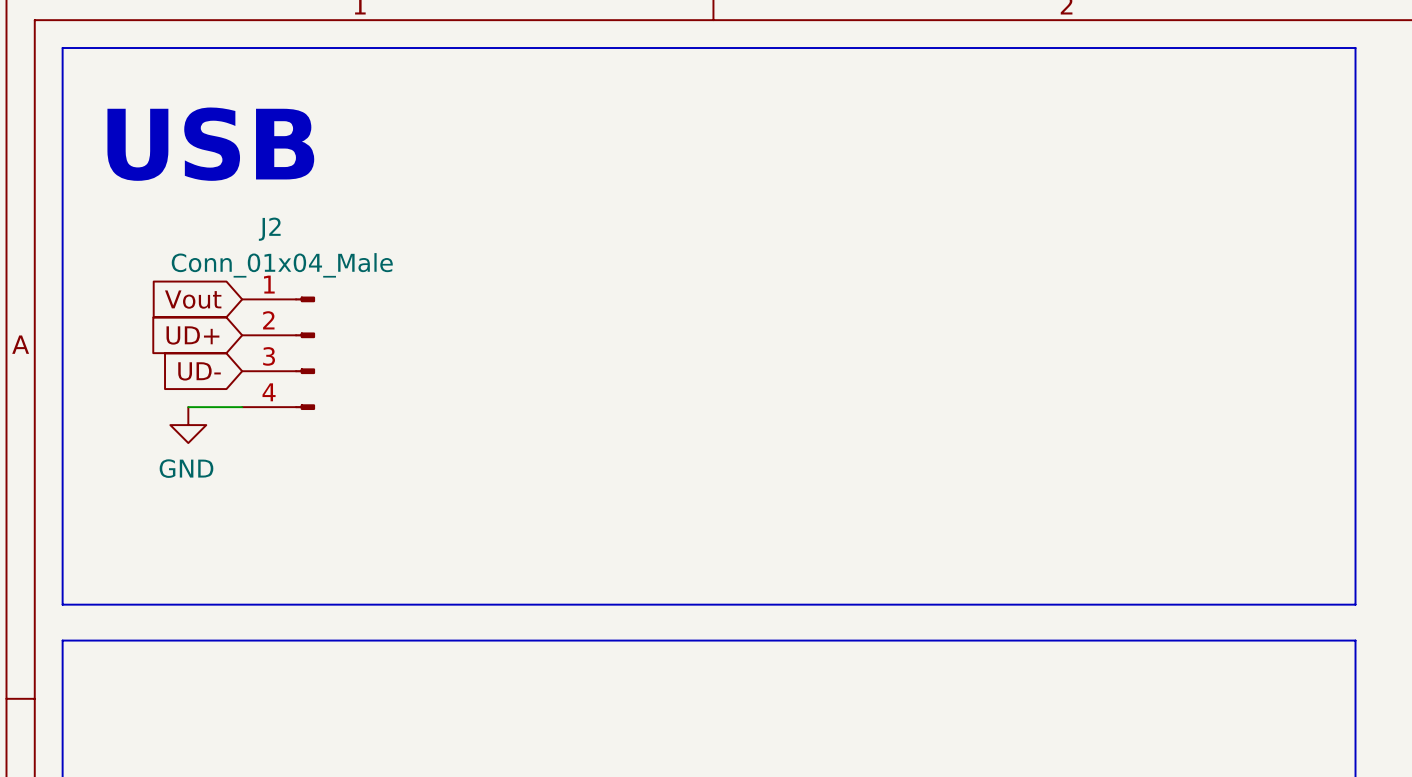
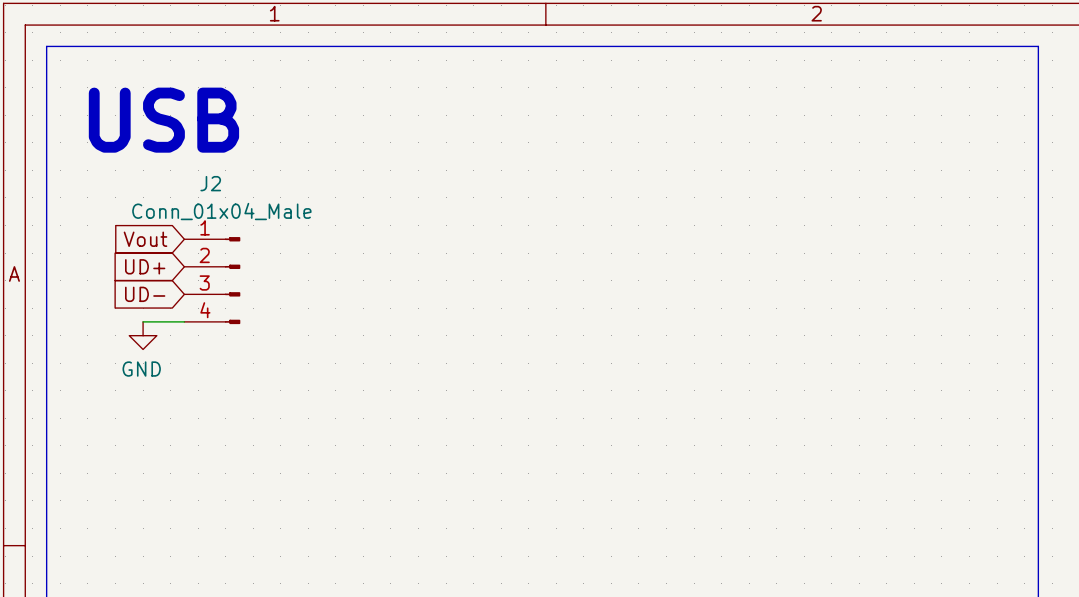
line: (62, 604) (1355, 604) -> (46, 473) (46, 500)
line: (62, 640) (1355, 640) -> (1038, 473) (1038, 500)

